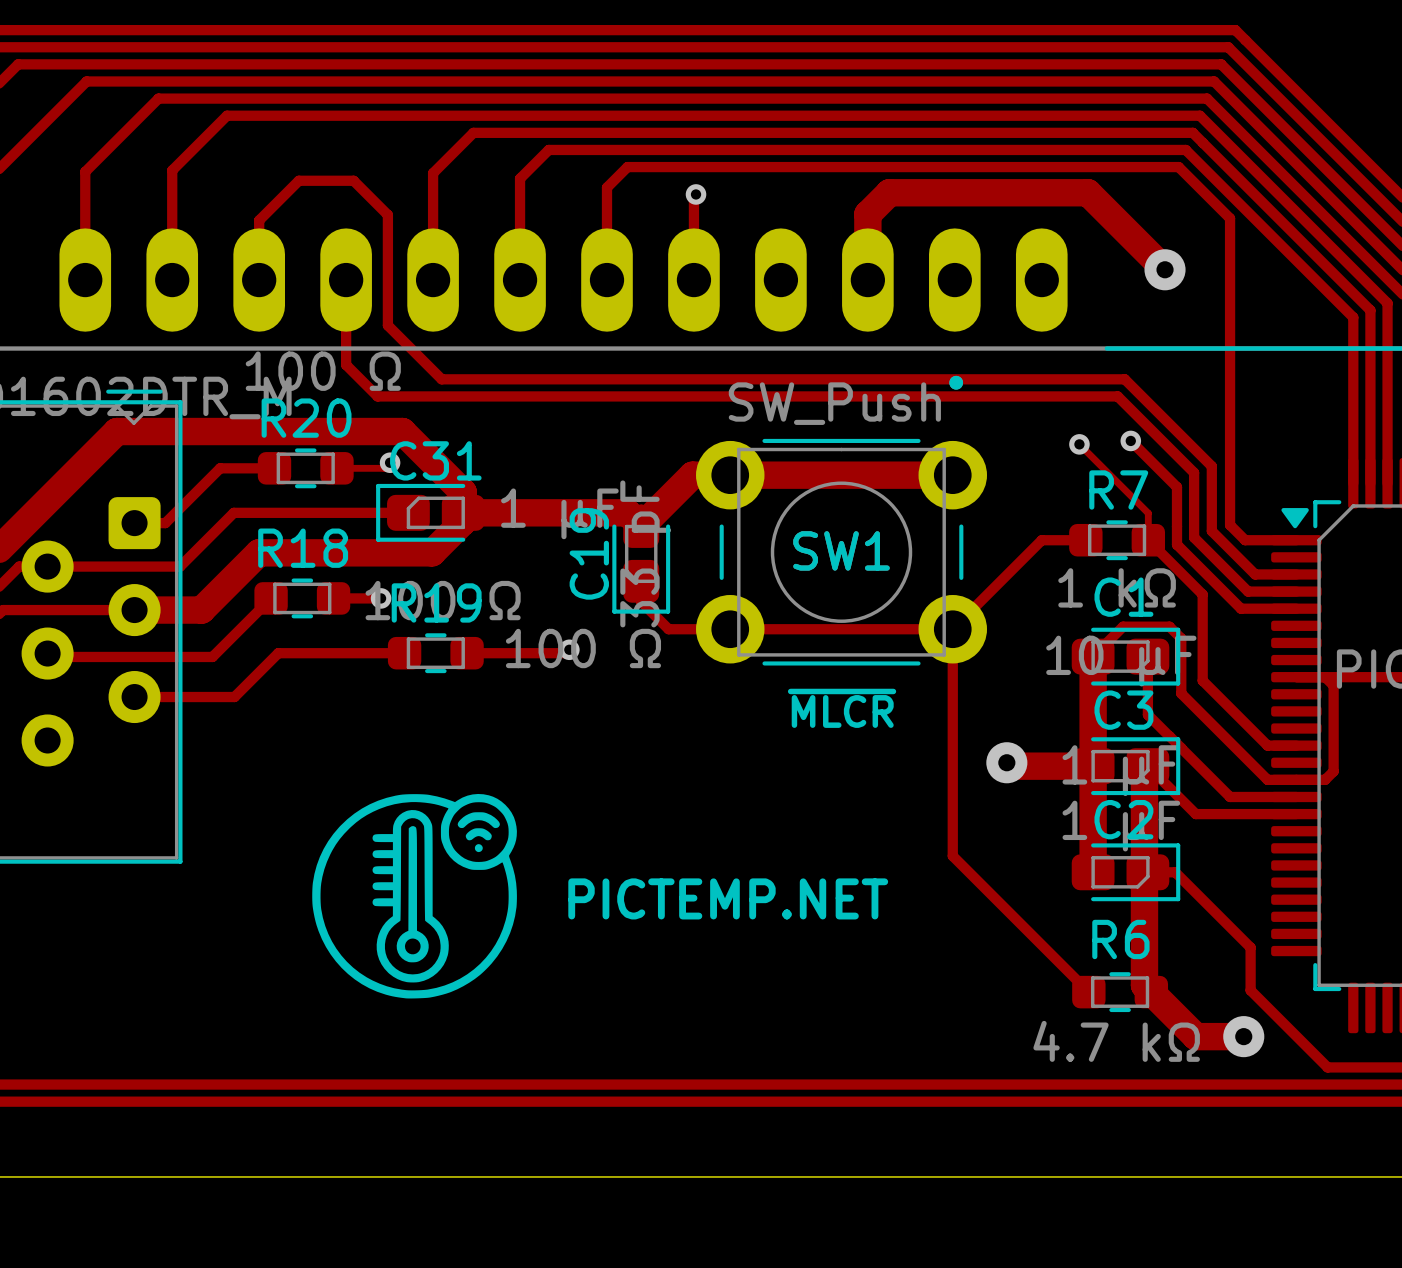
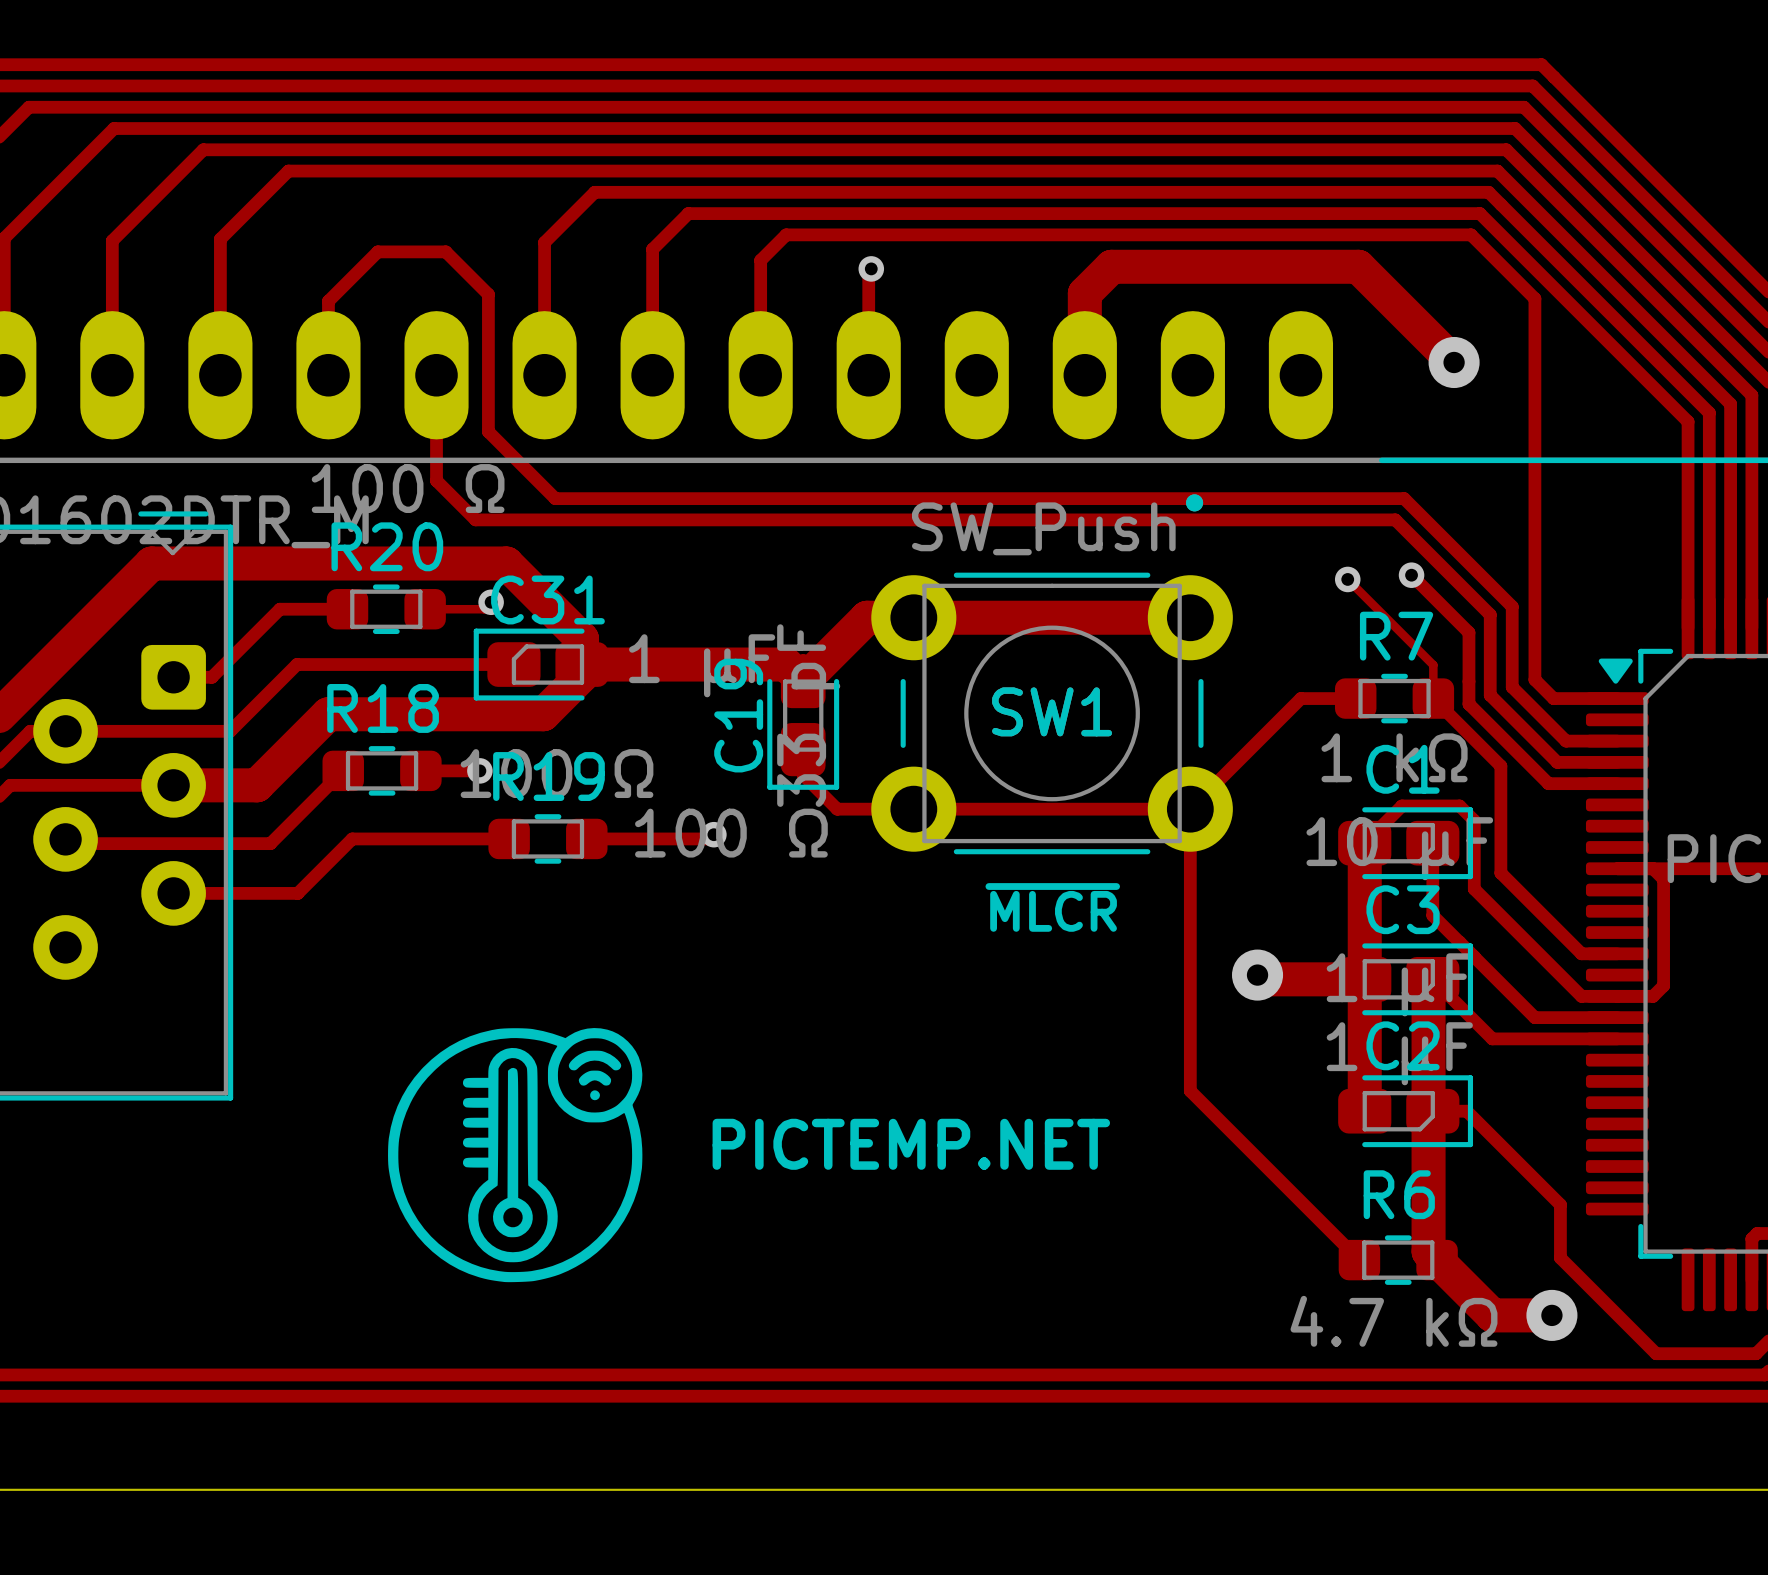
drawing position: (414, 896) -> (515, 1155)

